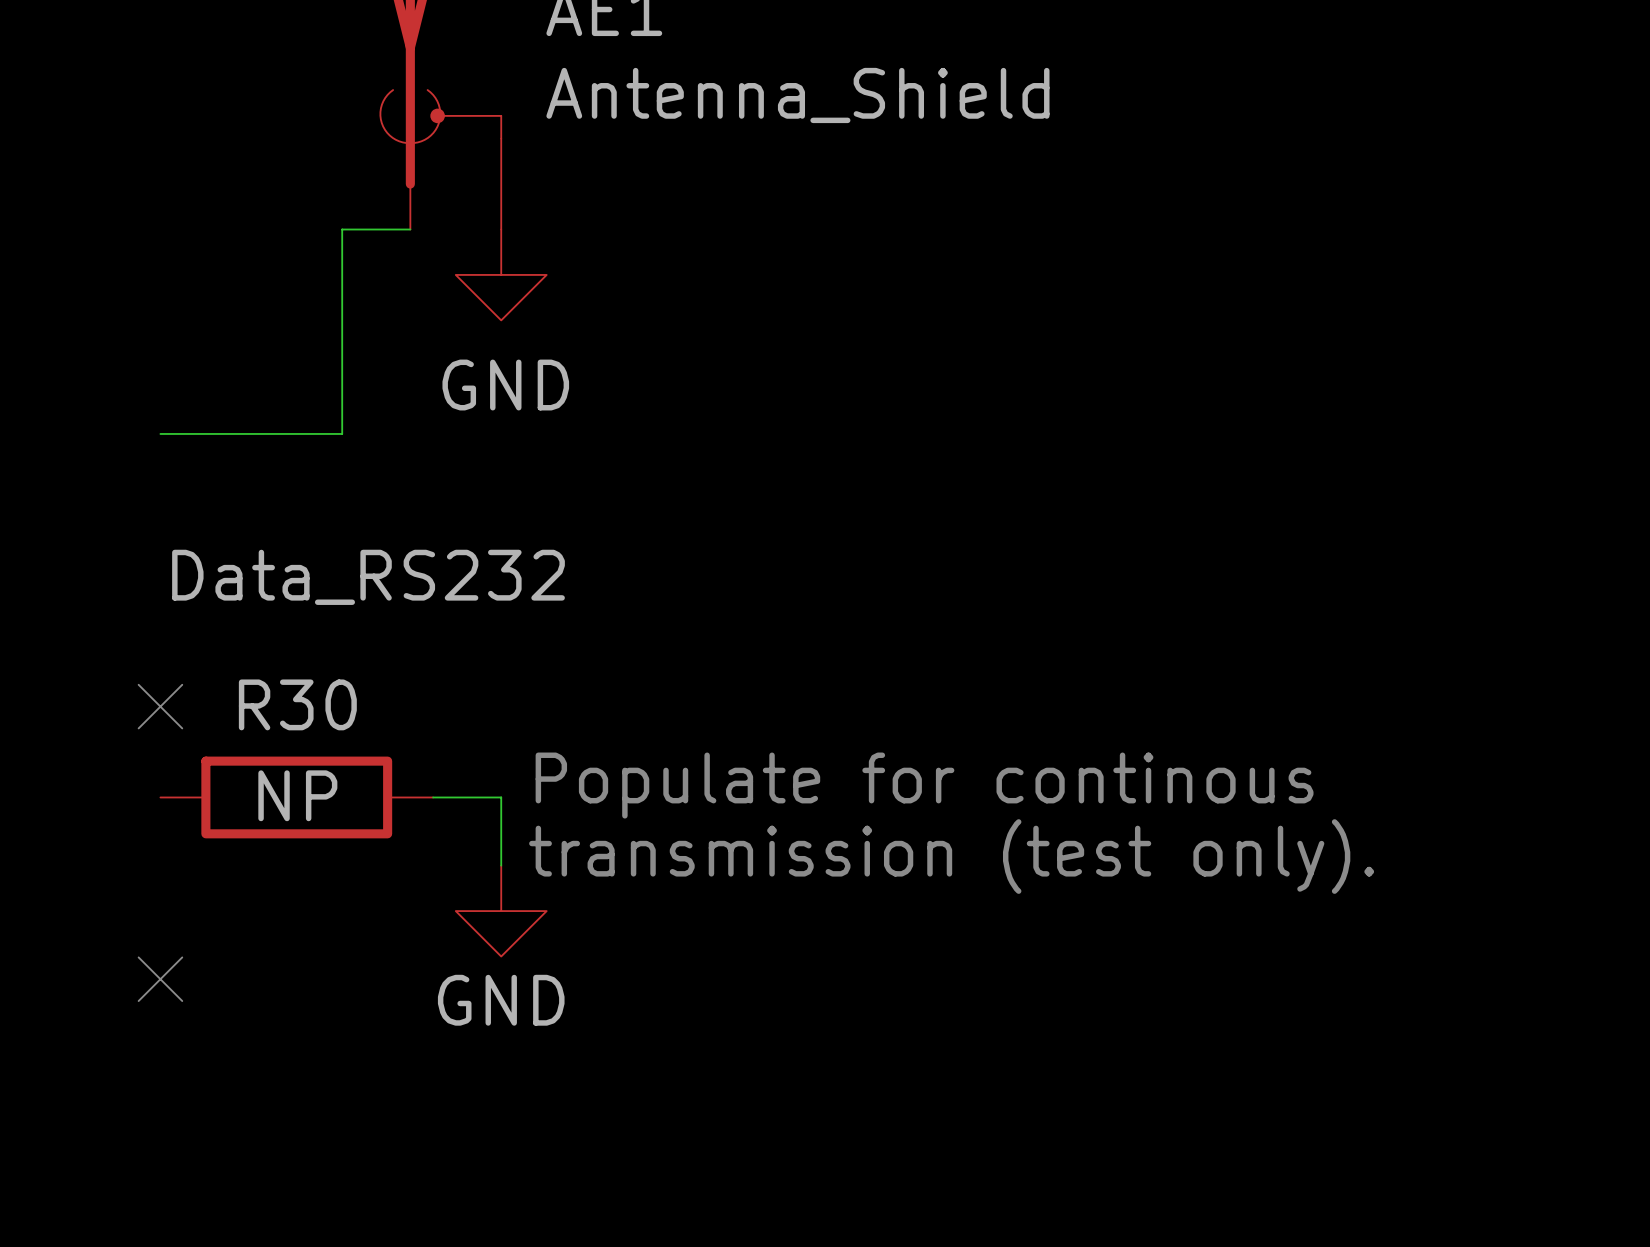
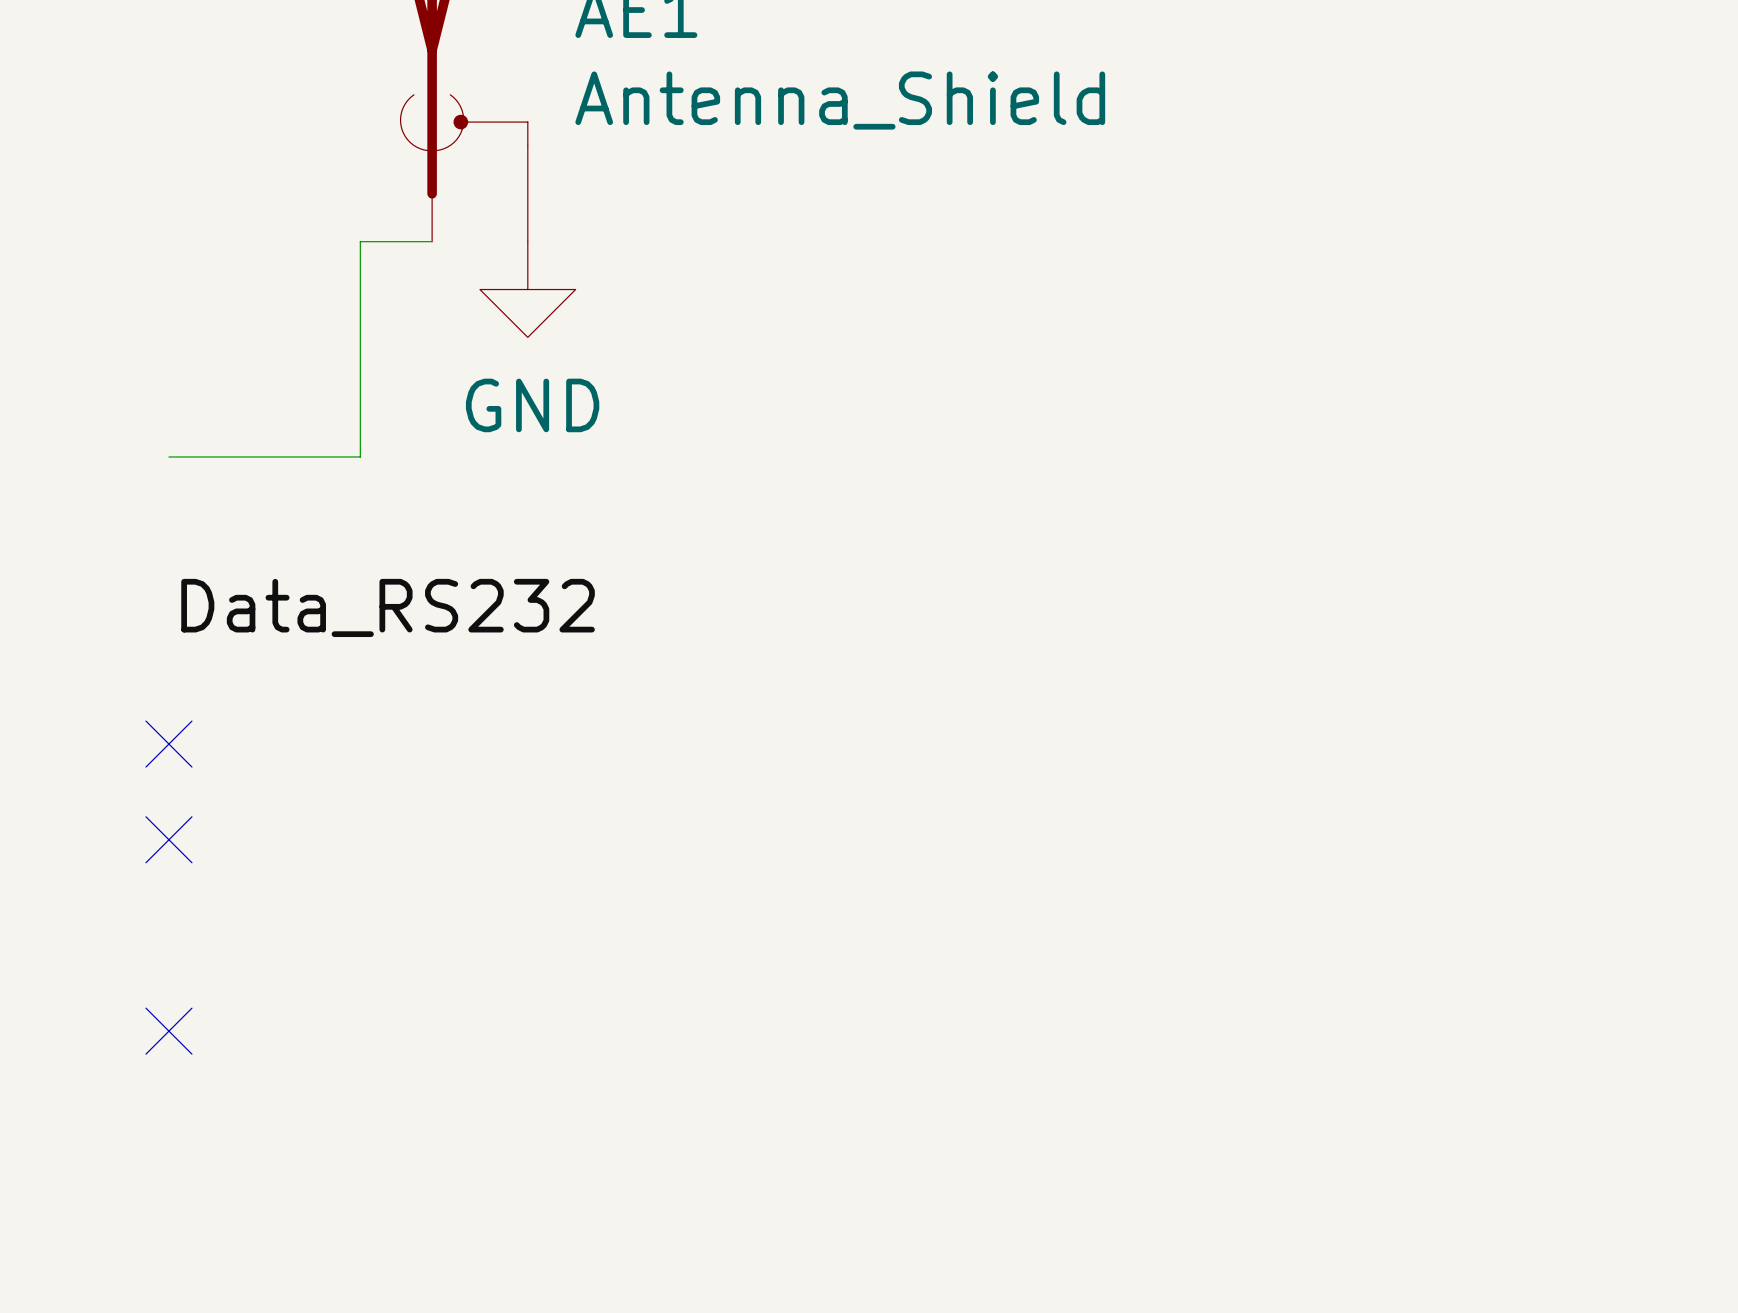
text: Populate for continous (924, 785) -> none
no-connect mark: none -> (168, 839)
R30: NP (296, 797) -> none
wire: (433, 797) (501, 797) (501, 865) -> none
text: transmission (test only). (951, 856) -> none
power symbol: GND (501, 911) -> none

